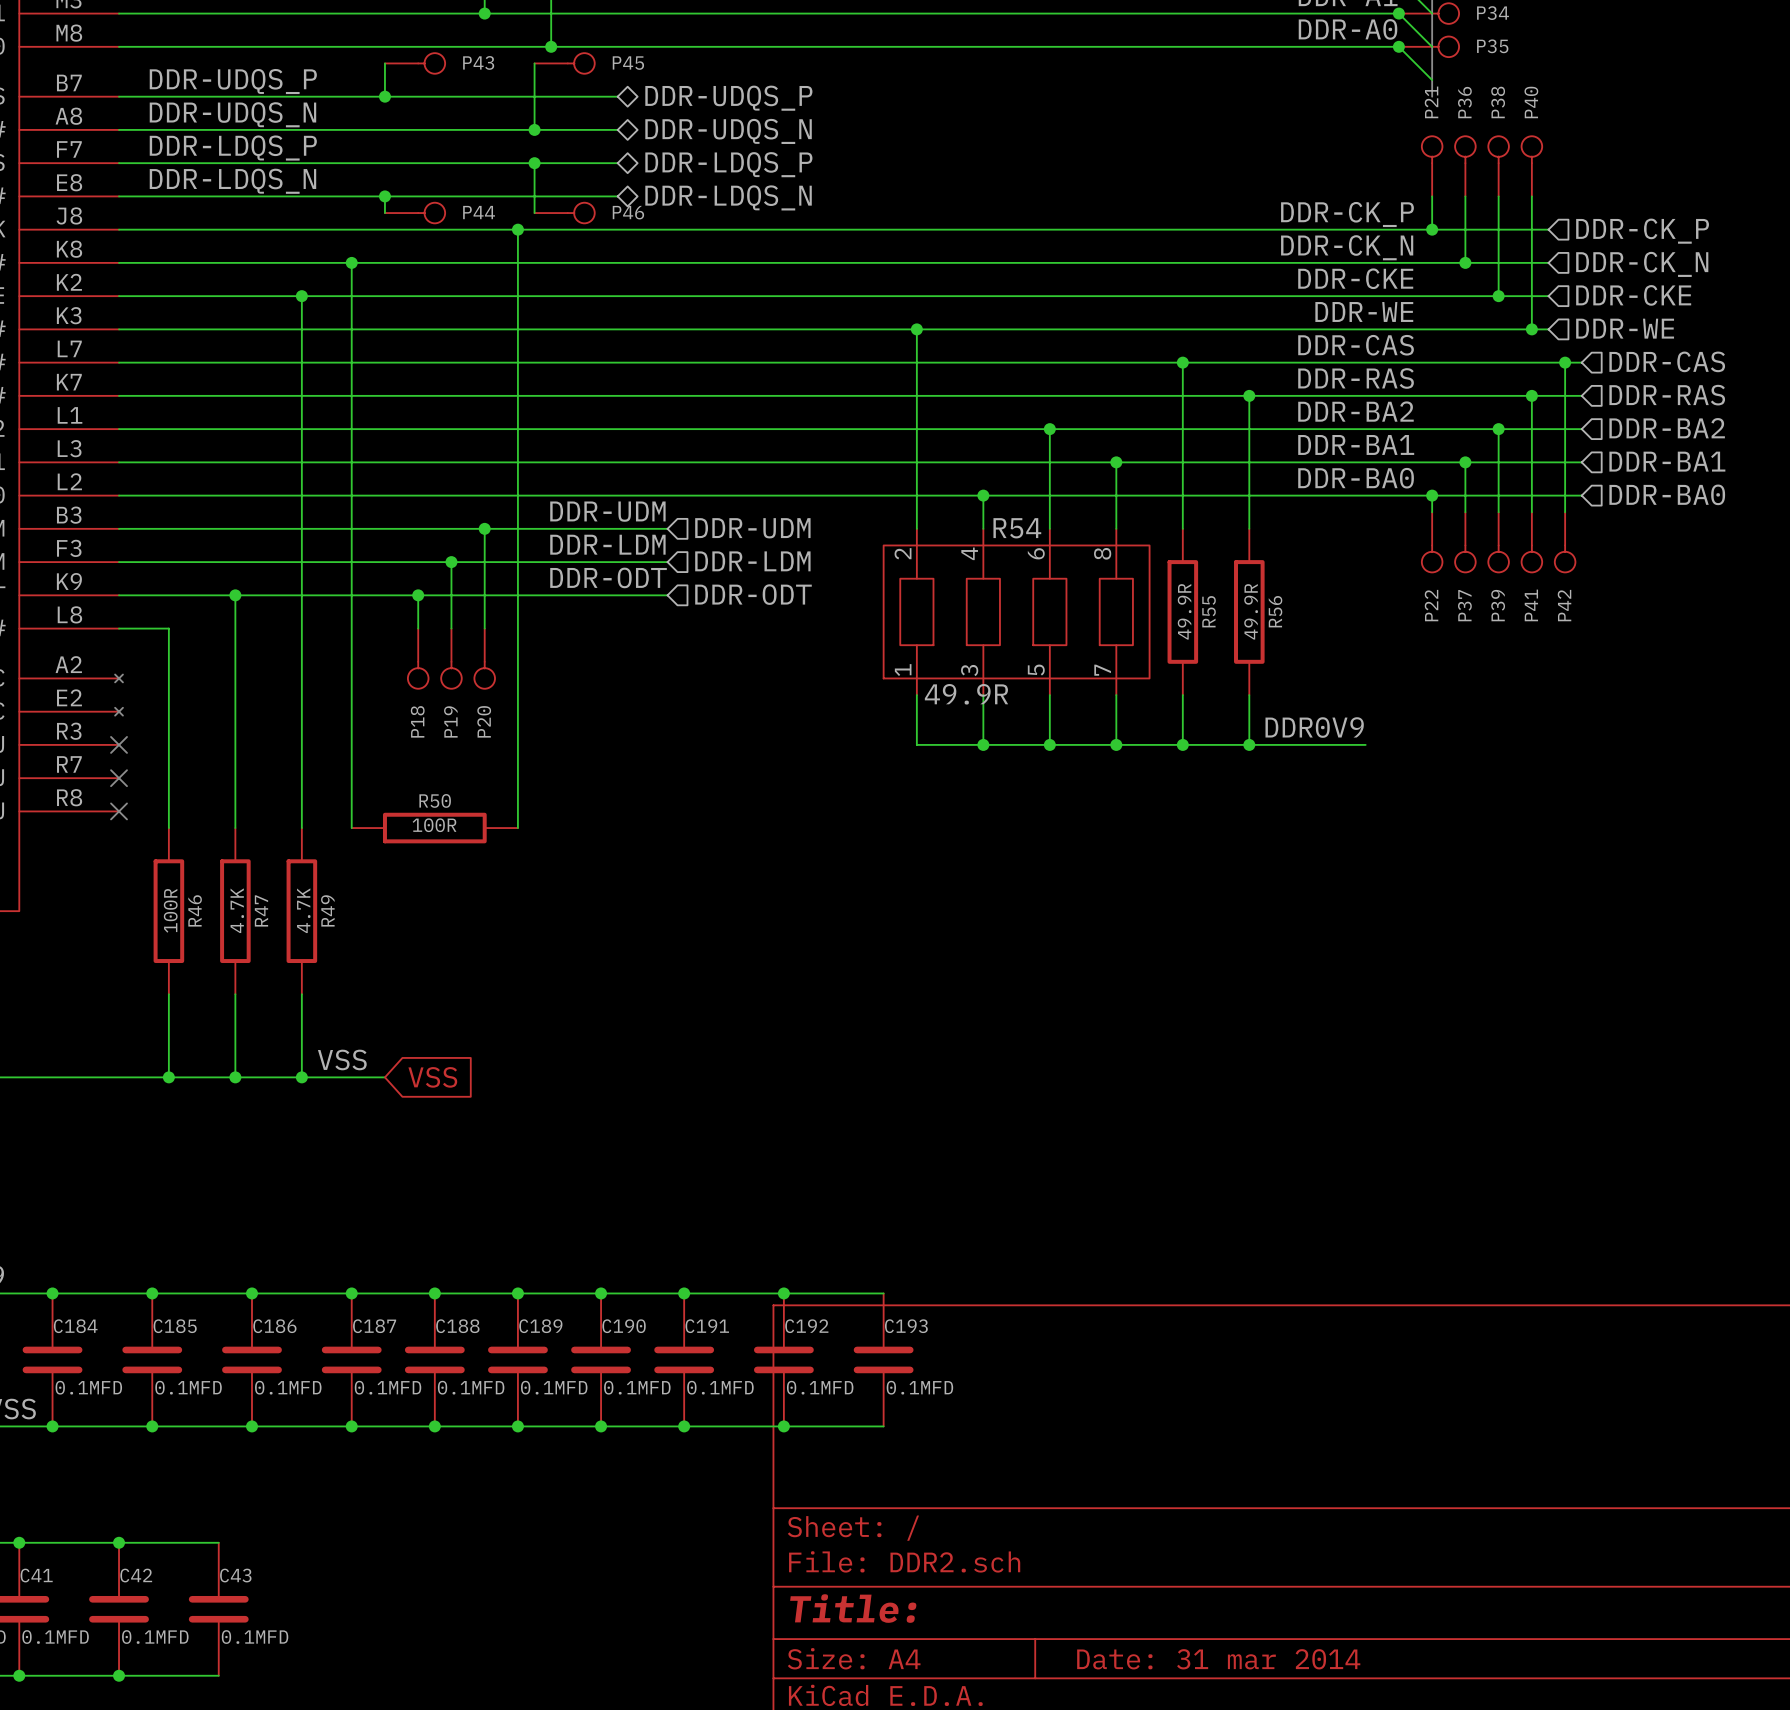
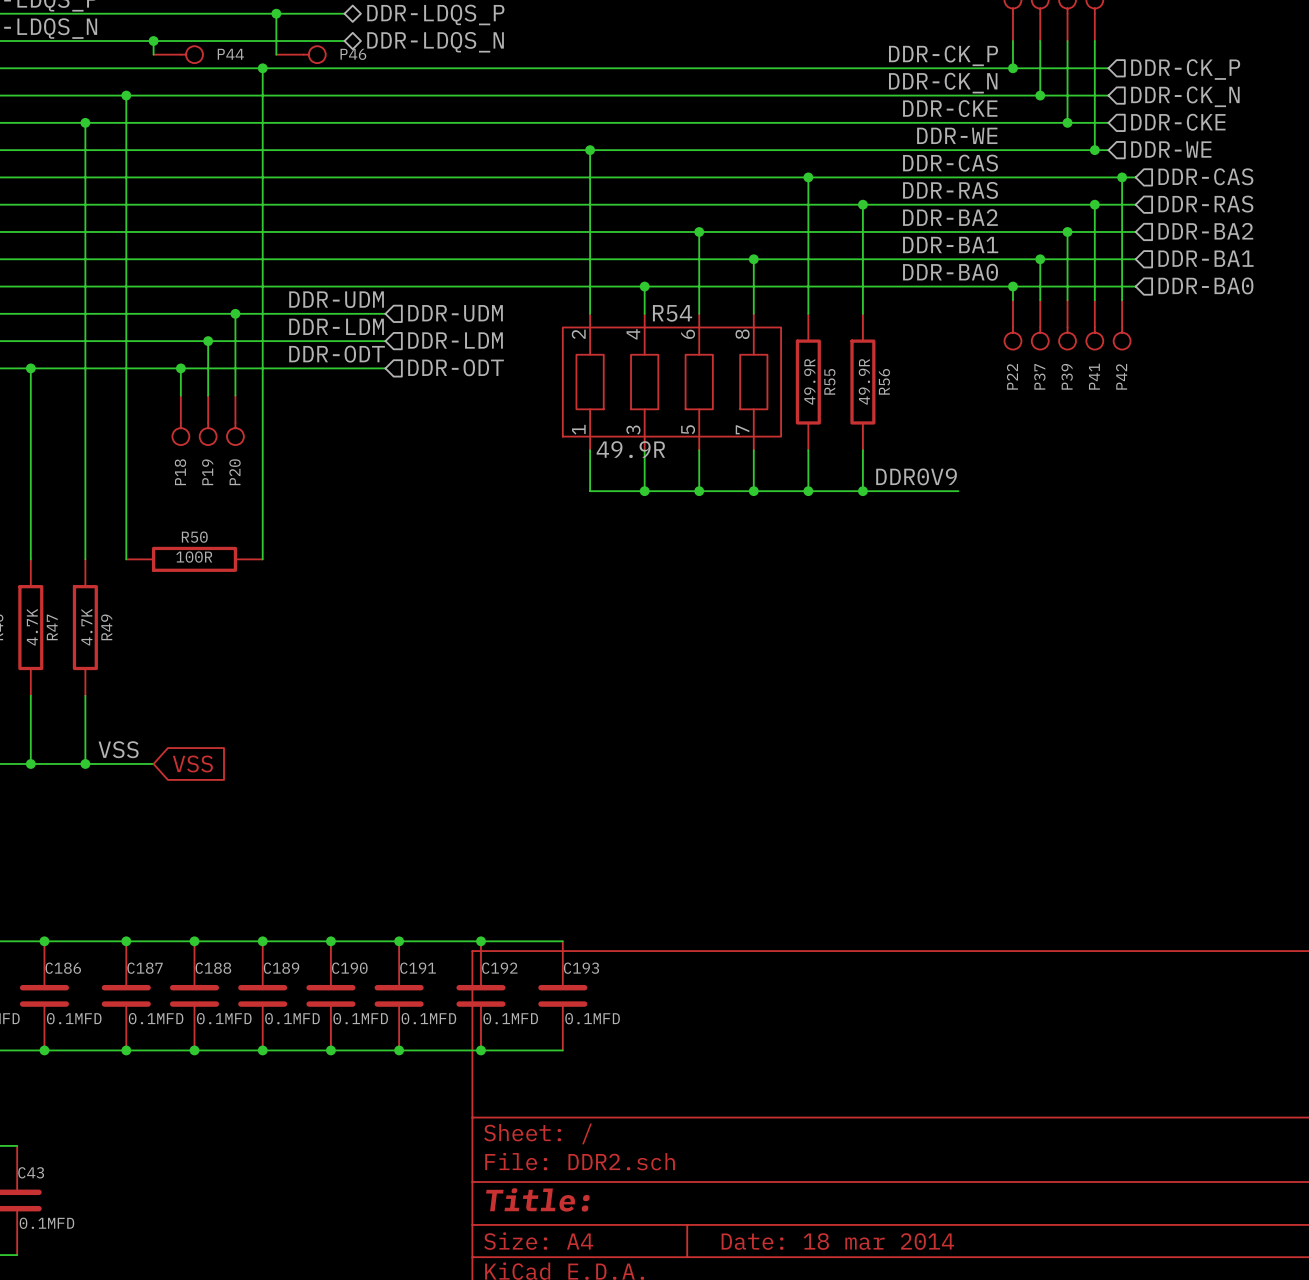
title block: Date: 31 mar 2014 (1218, 1659) -> Date: 18 mar 2014 (837, 1241)

